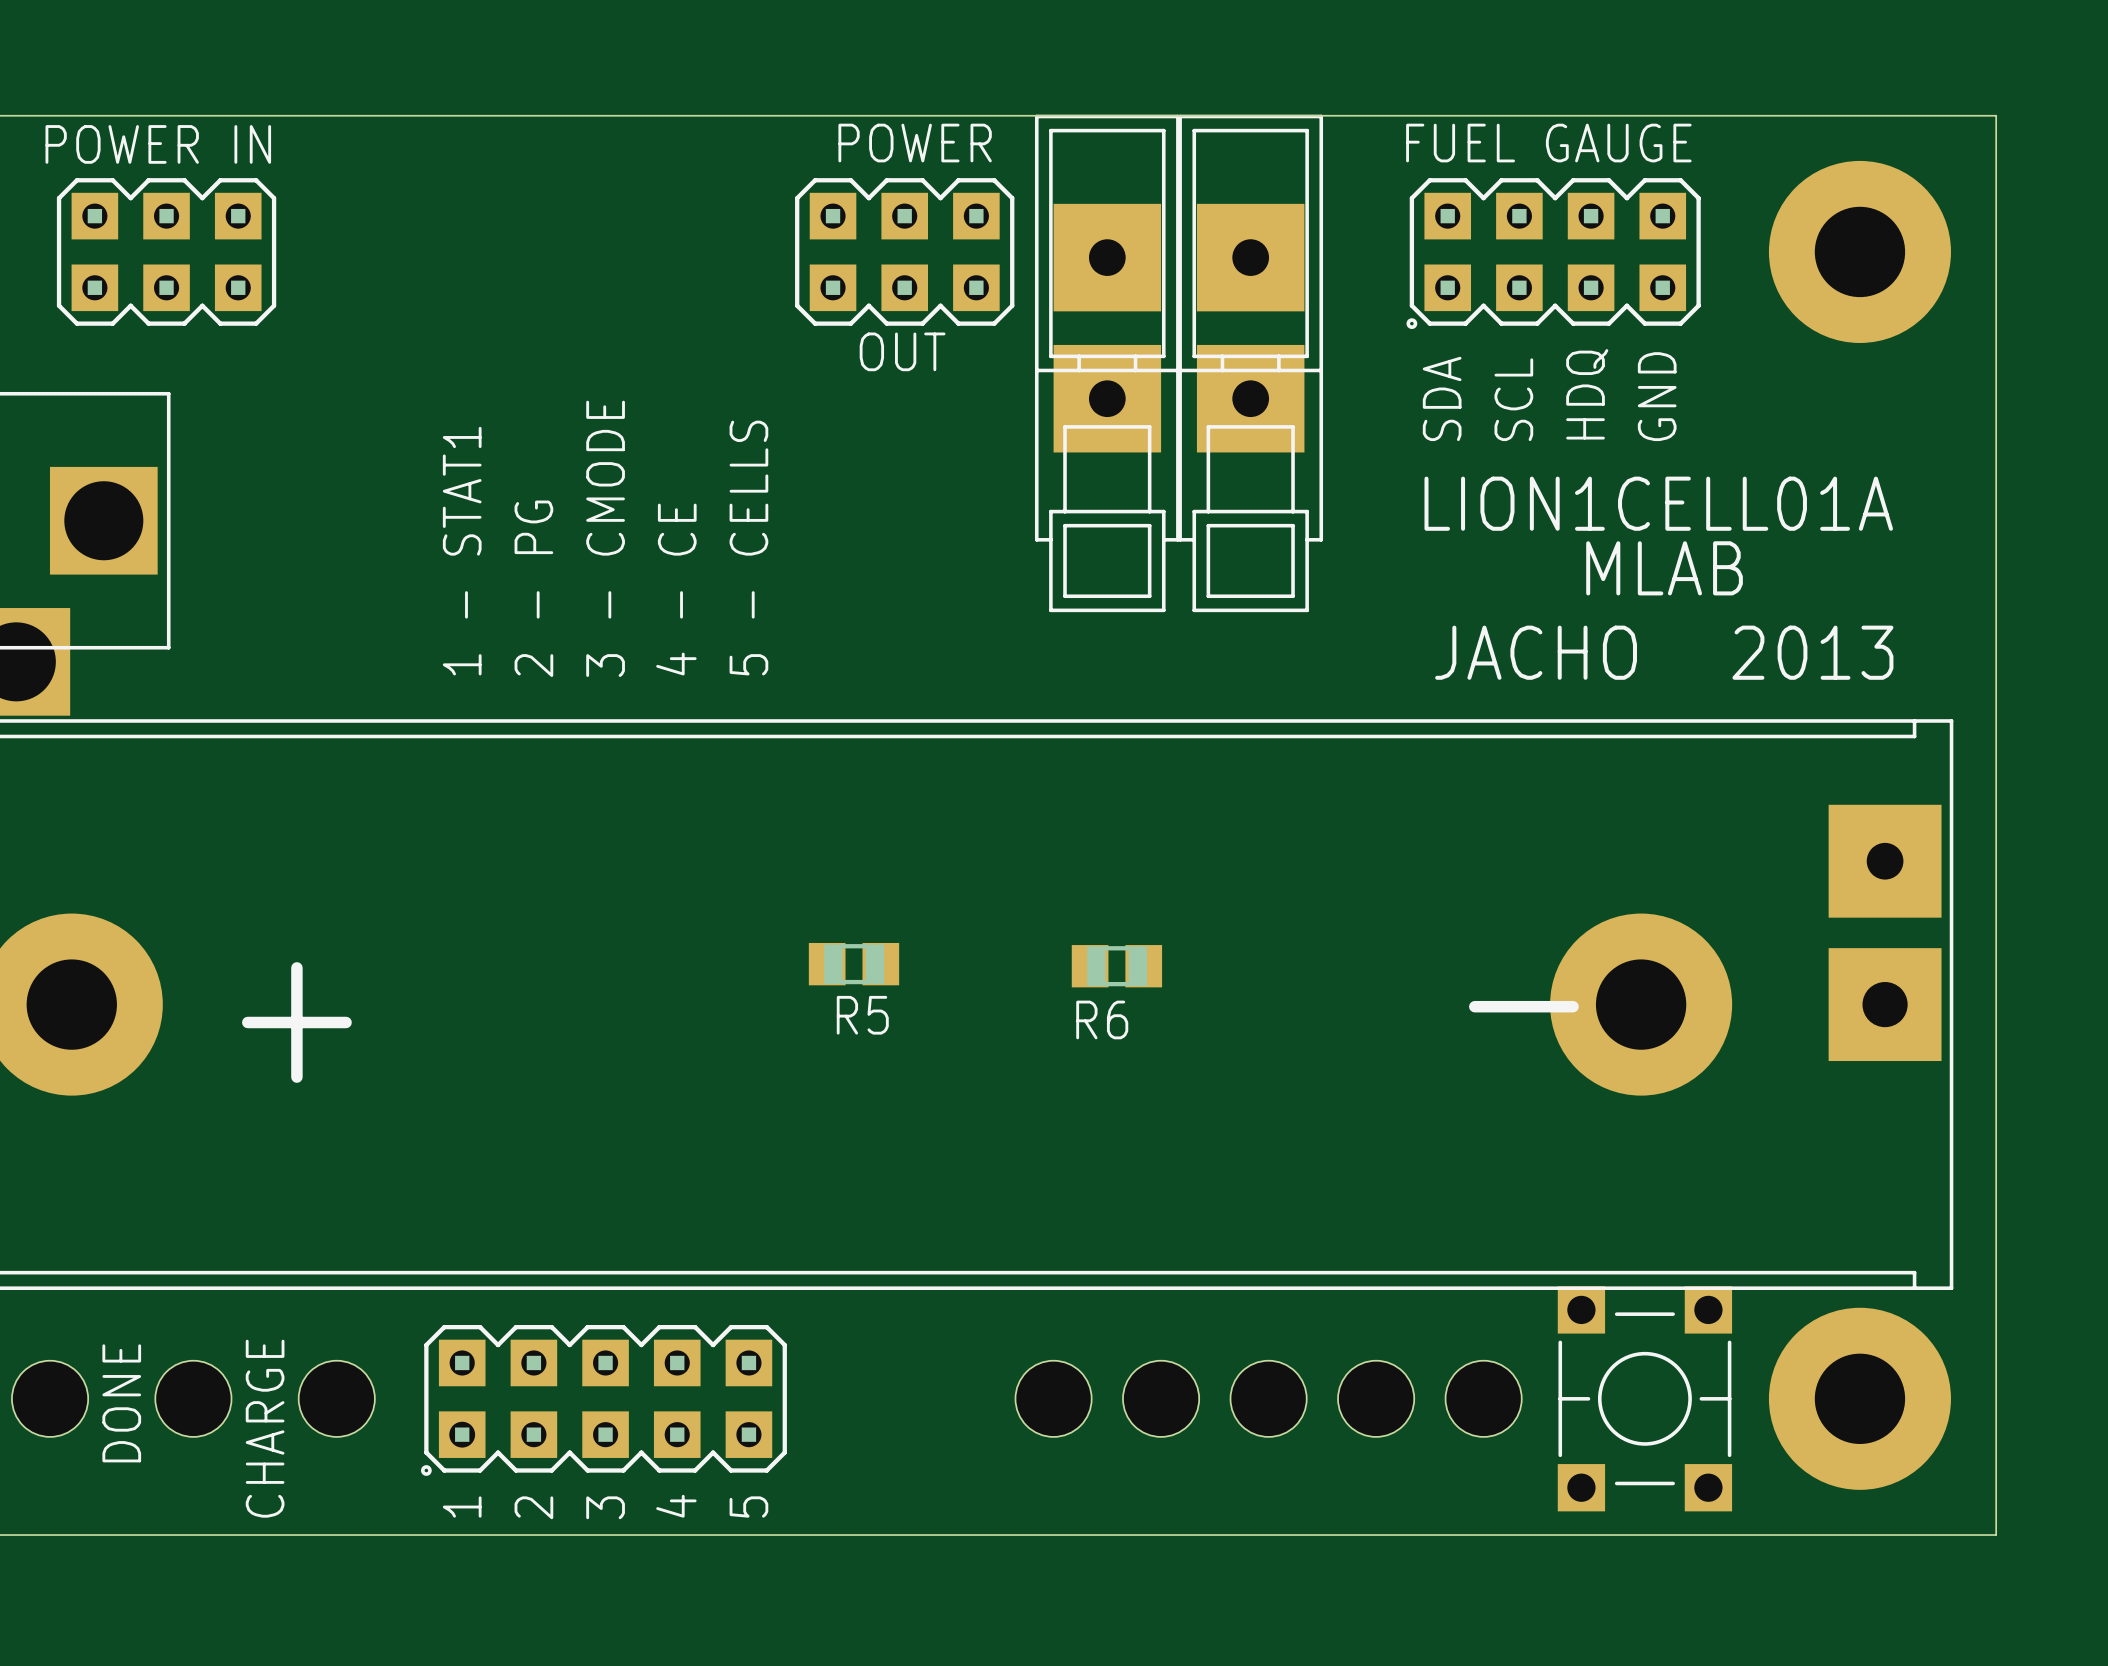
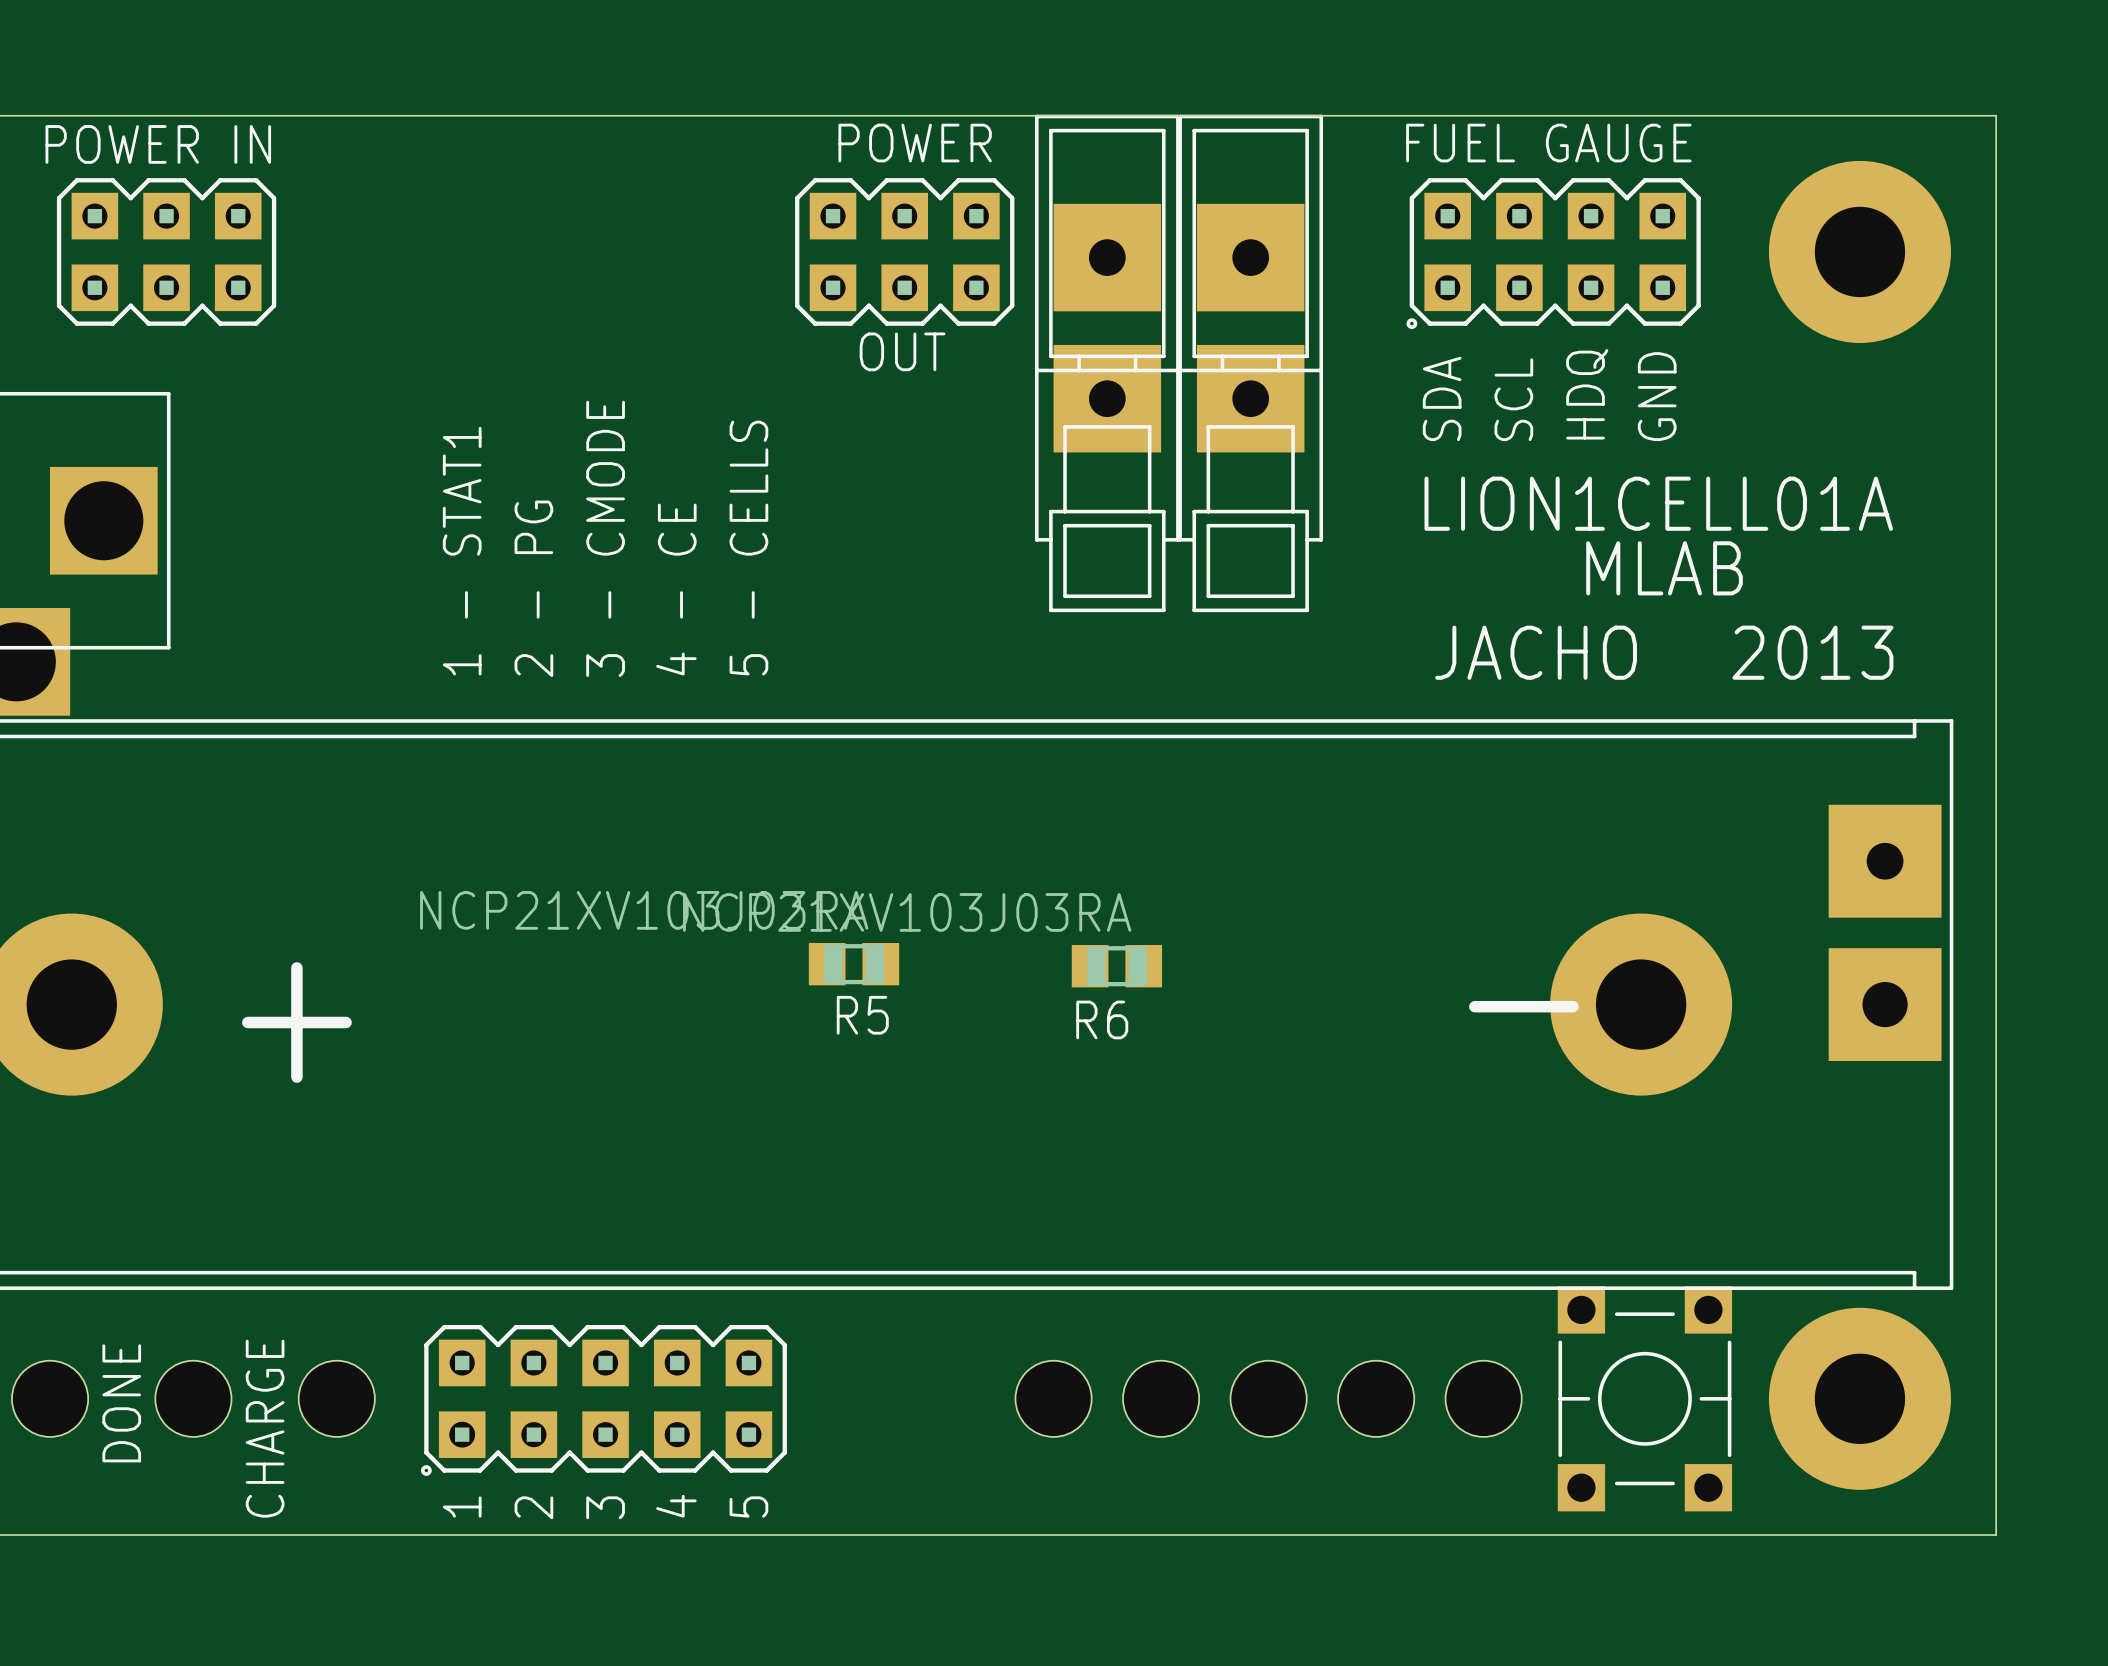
R5 value: none -> NCP21XV103J03RA (644, 910)
R6 value: none -> NCP21XV103J03RA (907, 912)

